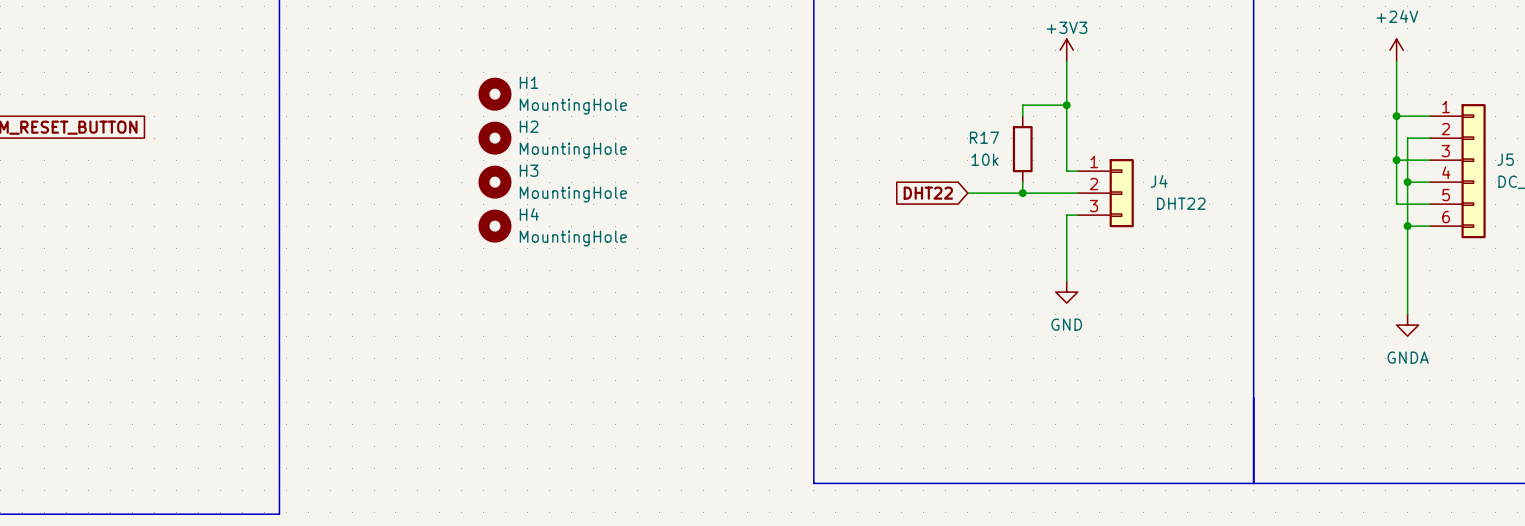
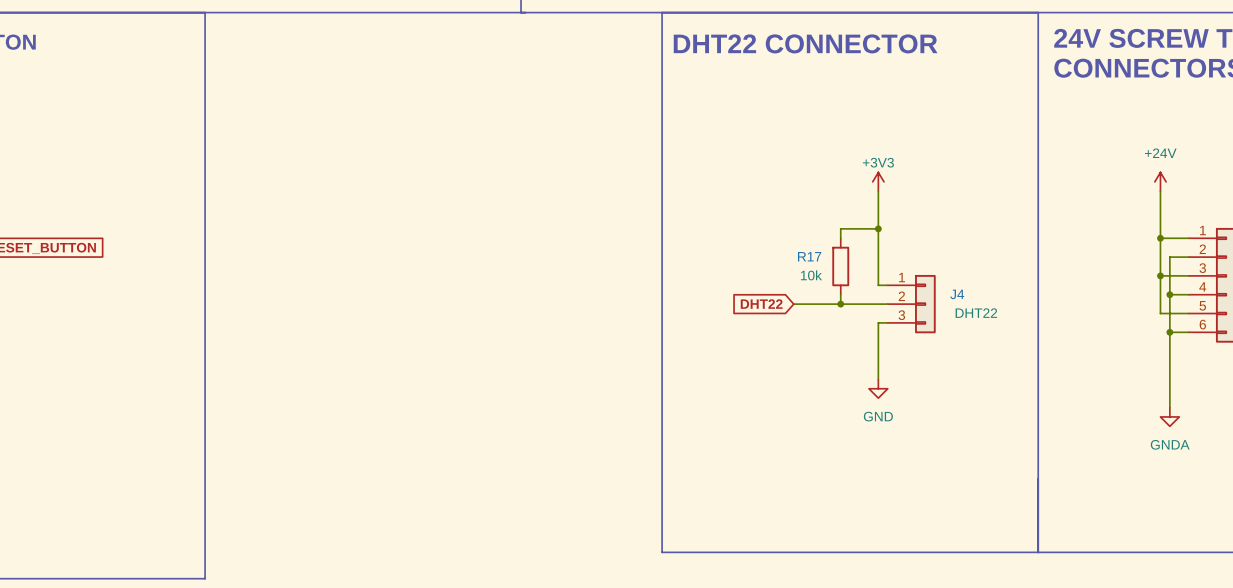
H1: MountingHole (494, 94) -> none
H2: MountingHole (494, 138) -> none
H3: MountingHole (494, 182) -> none
H4: MountingHole (494, 226) -> none

